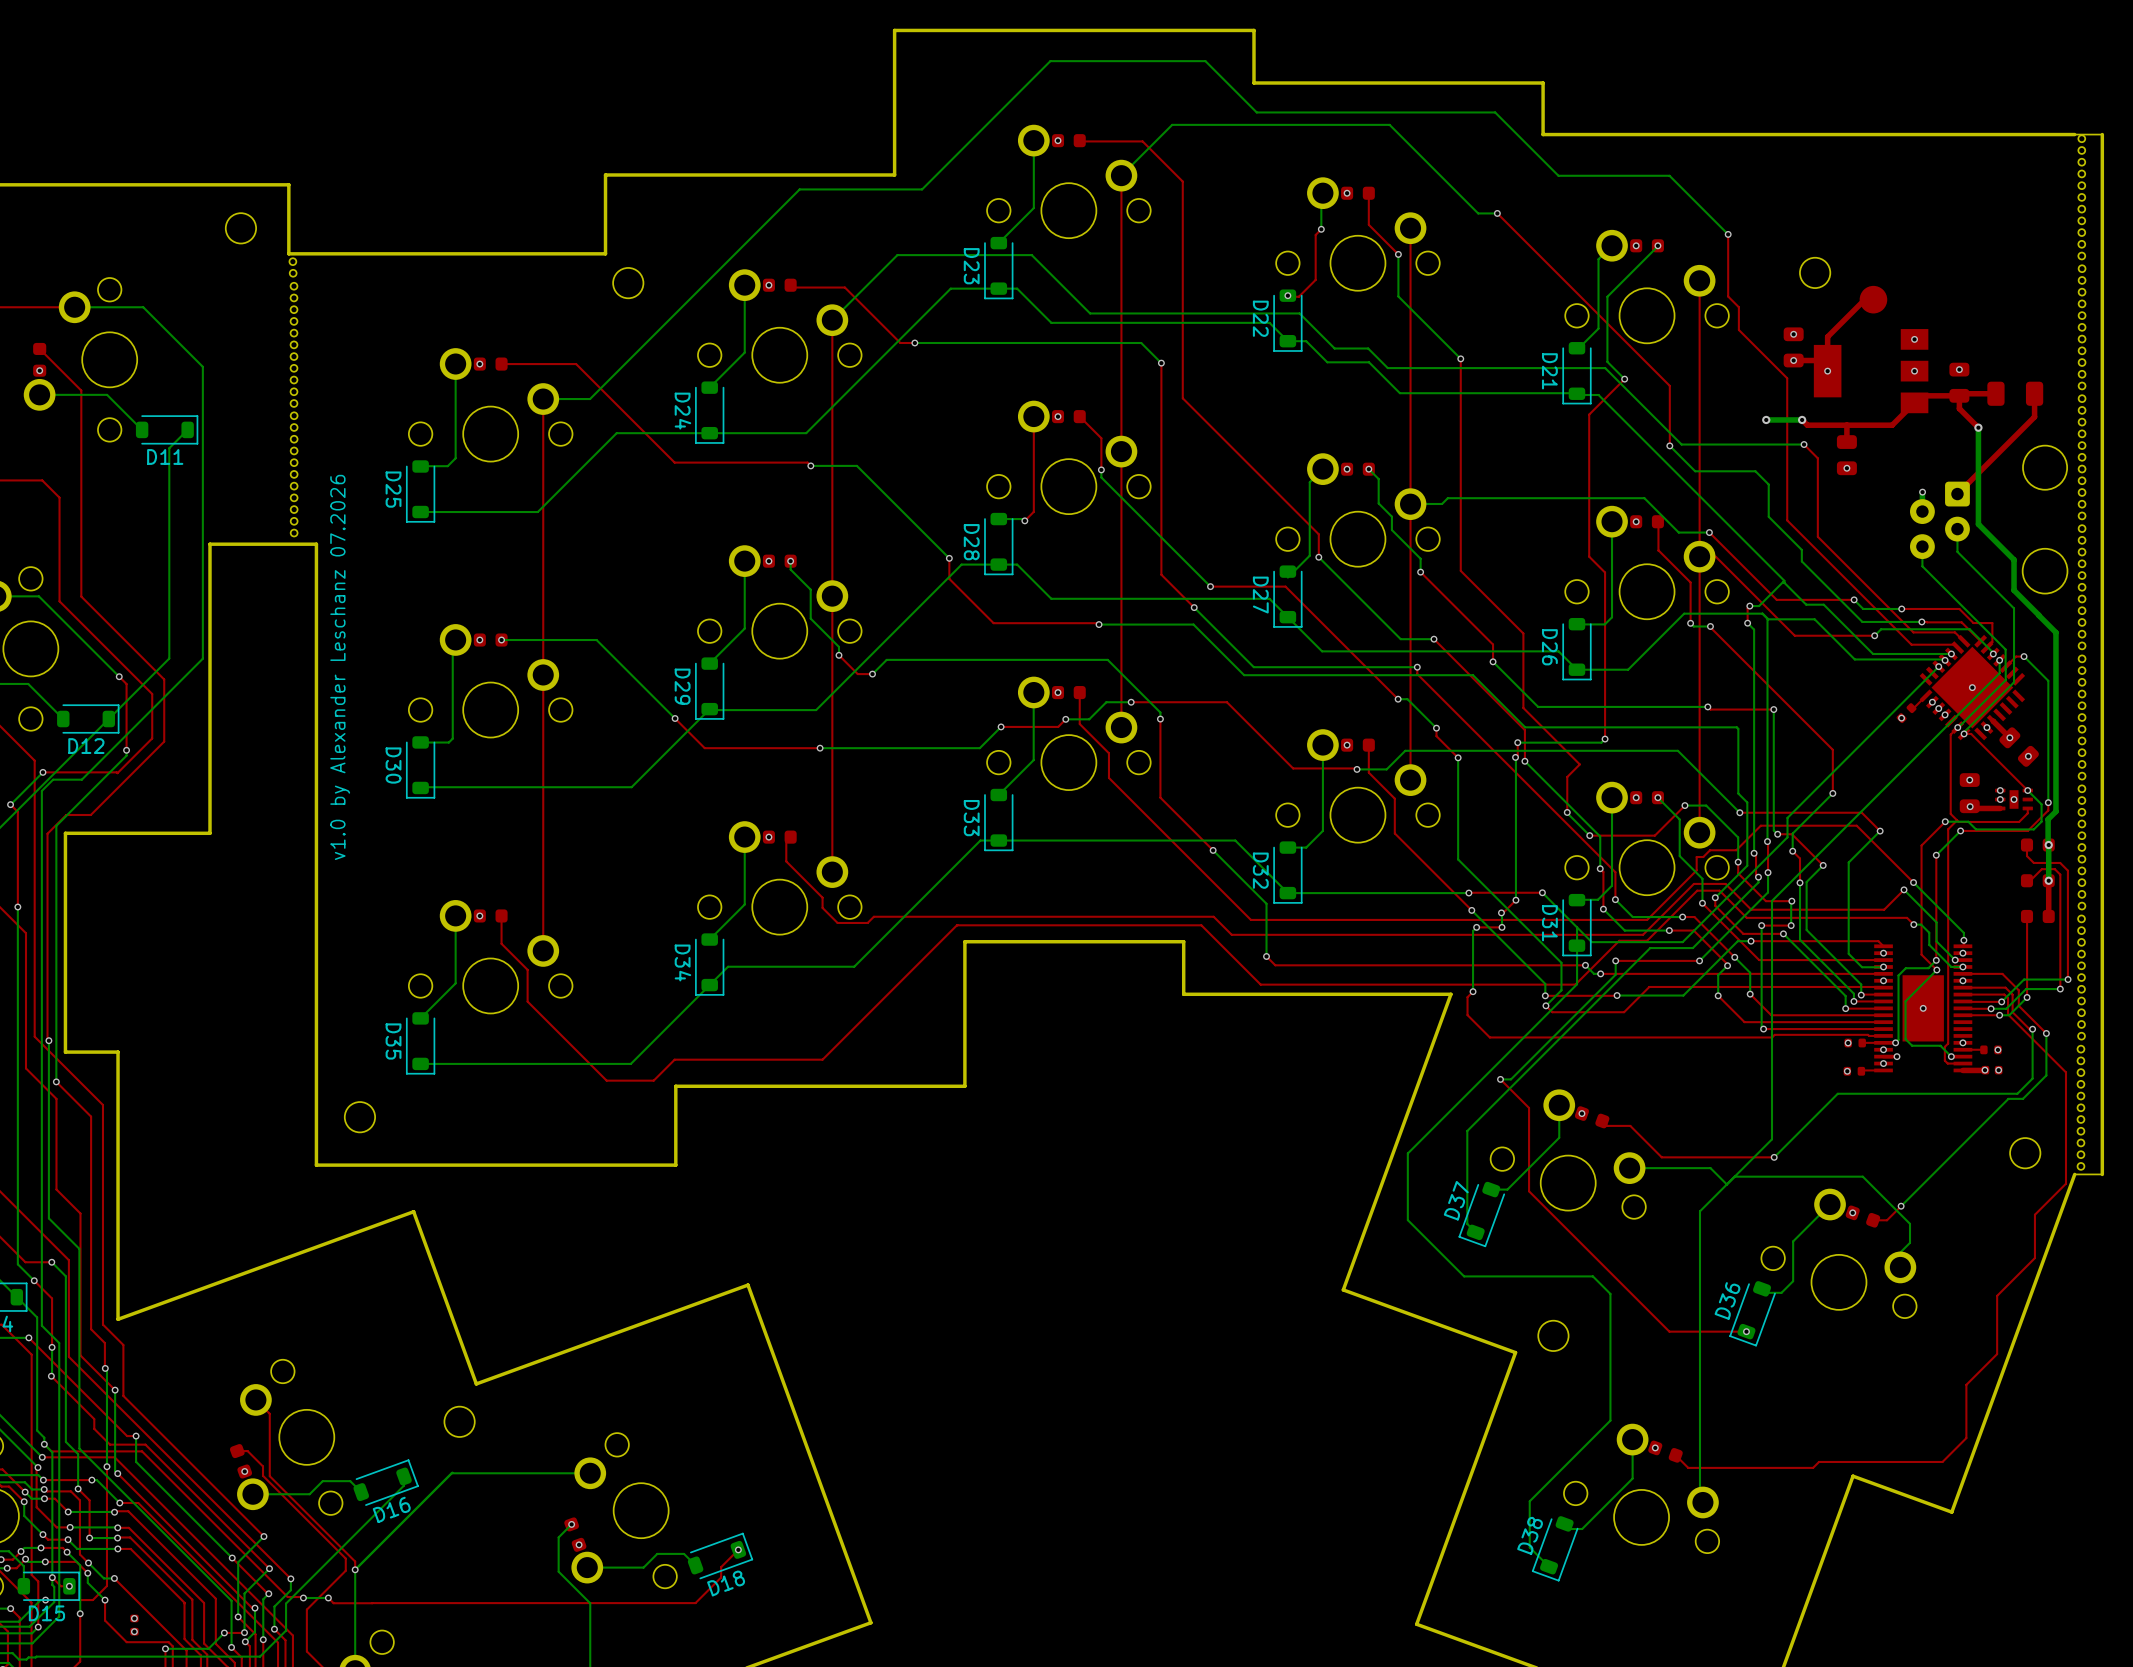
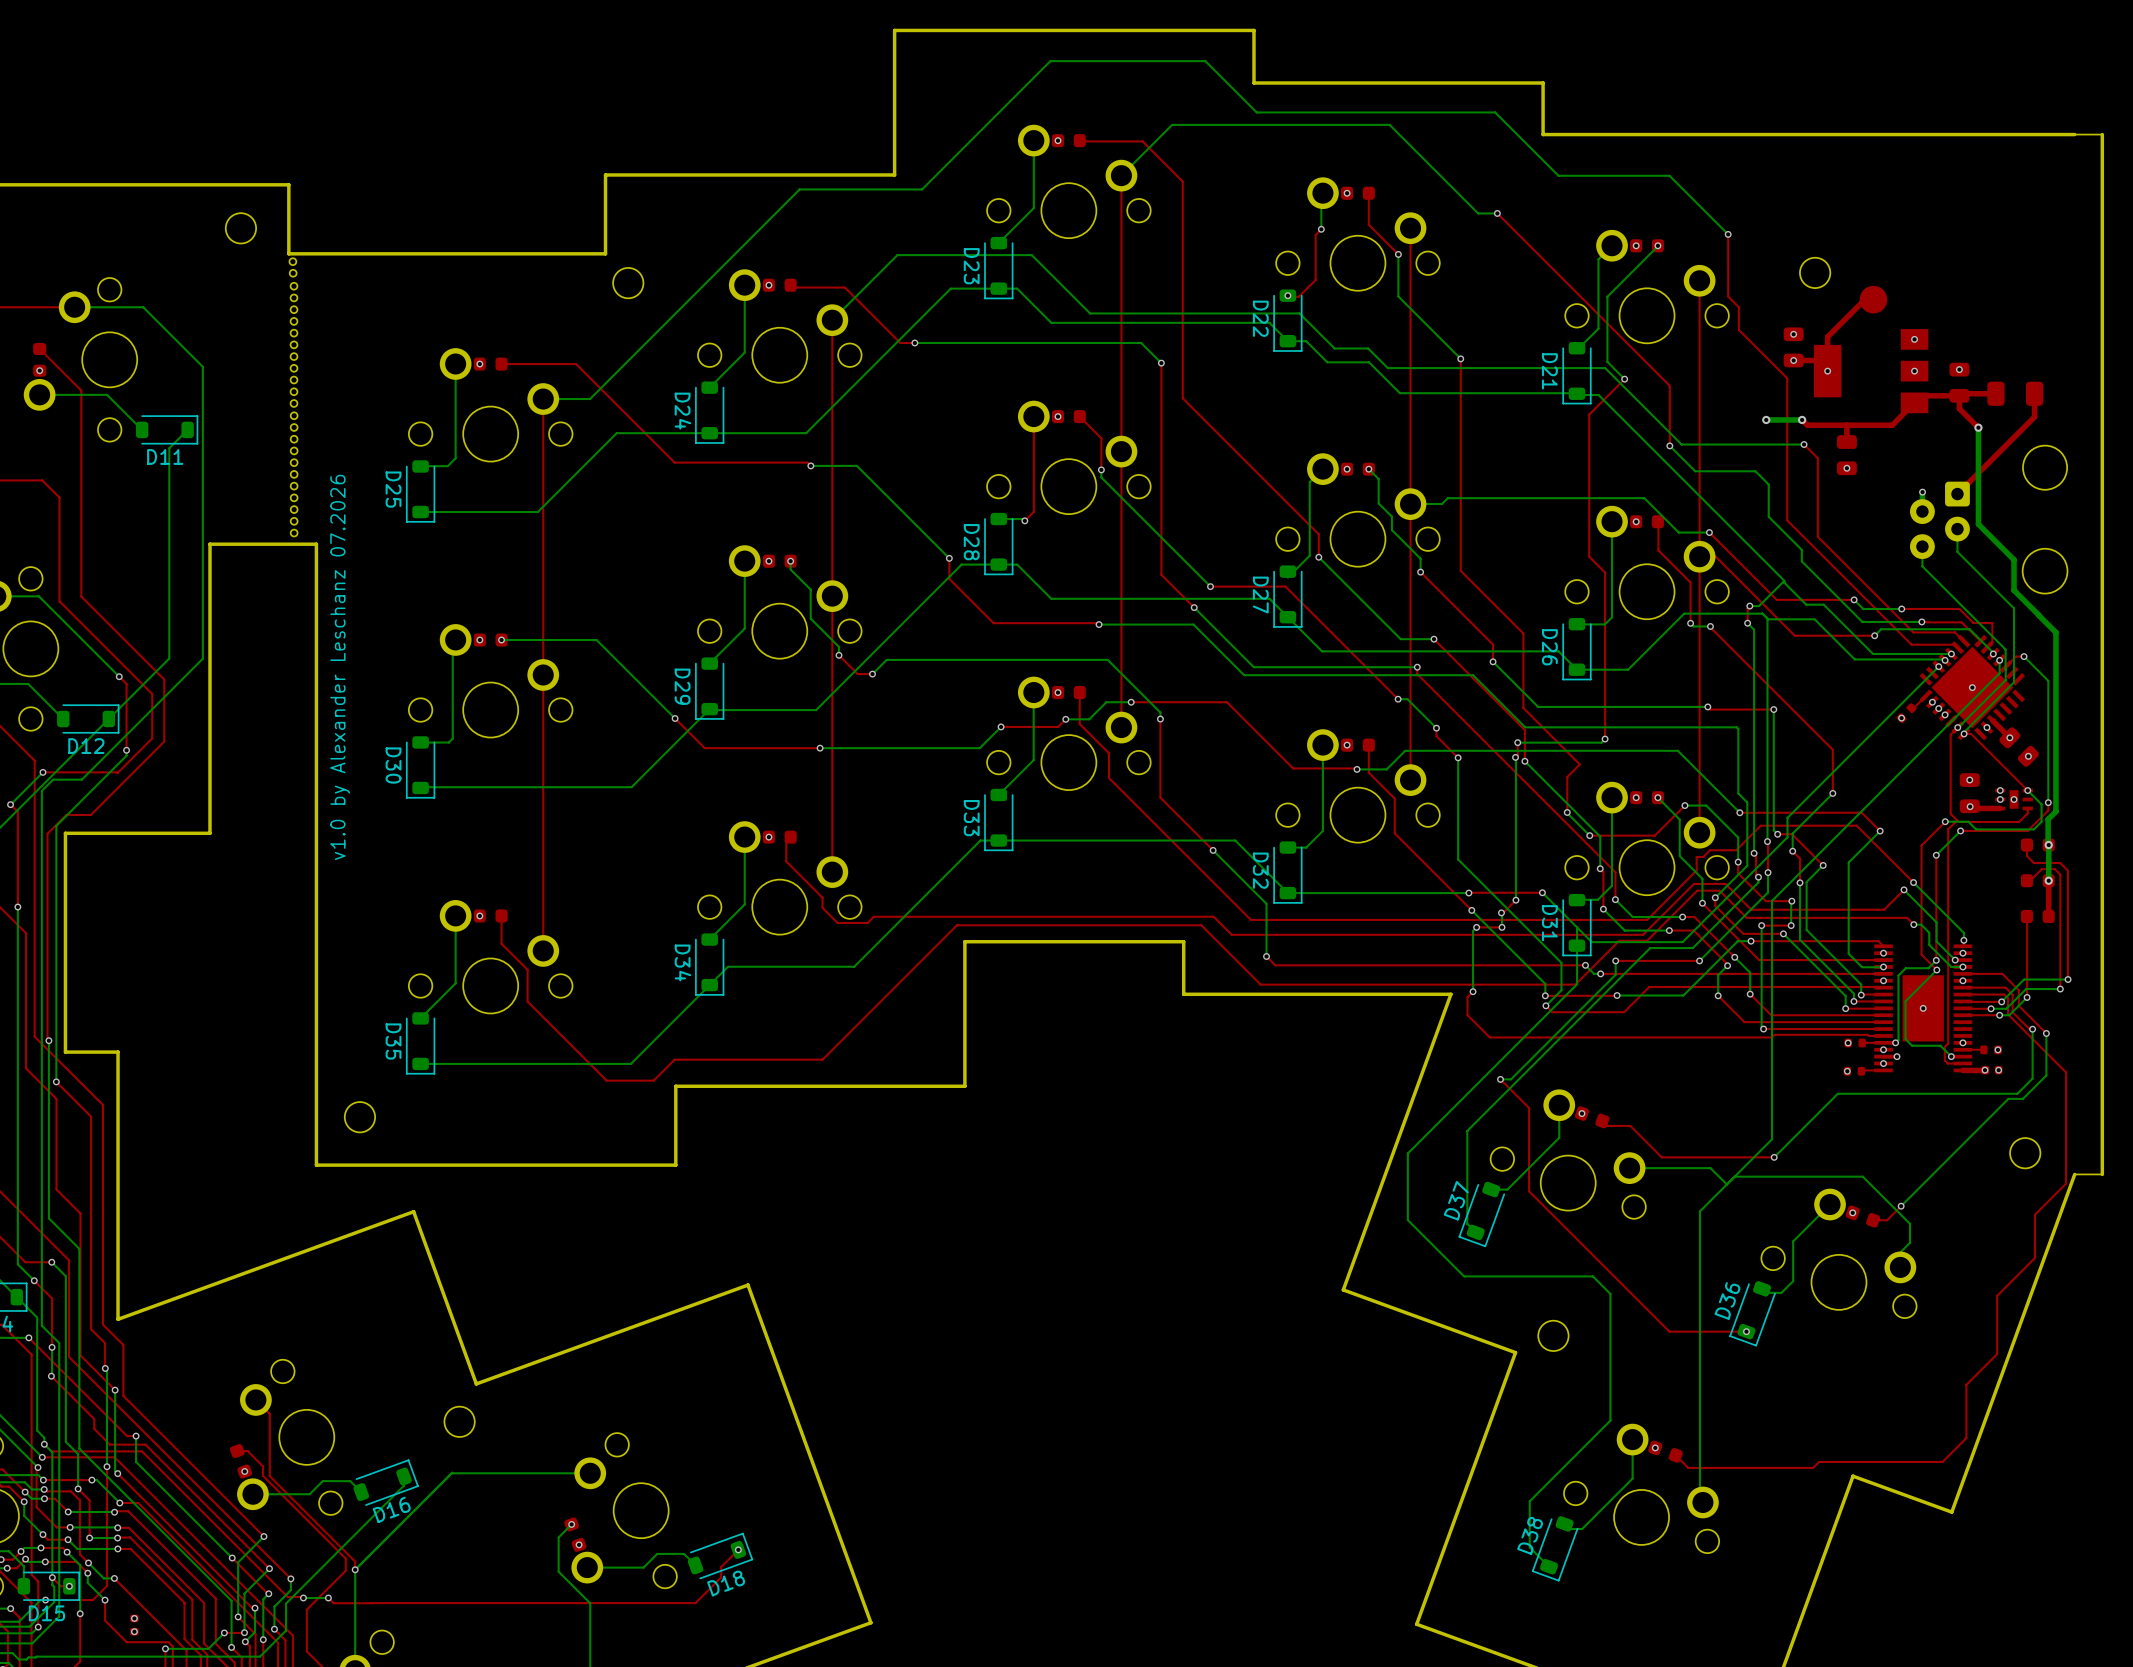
part: (2081, 197) -> none
part: (2082, 327) -> none
part: (2082, 457) -> none
part: (2082, 587) -> none
part: (2082, 717) -> none
part: (2081, 847) -> none
part: (2081, 977) -> none
part: (2080, 1107) -> none

